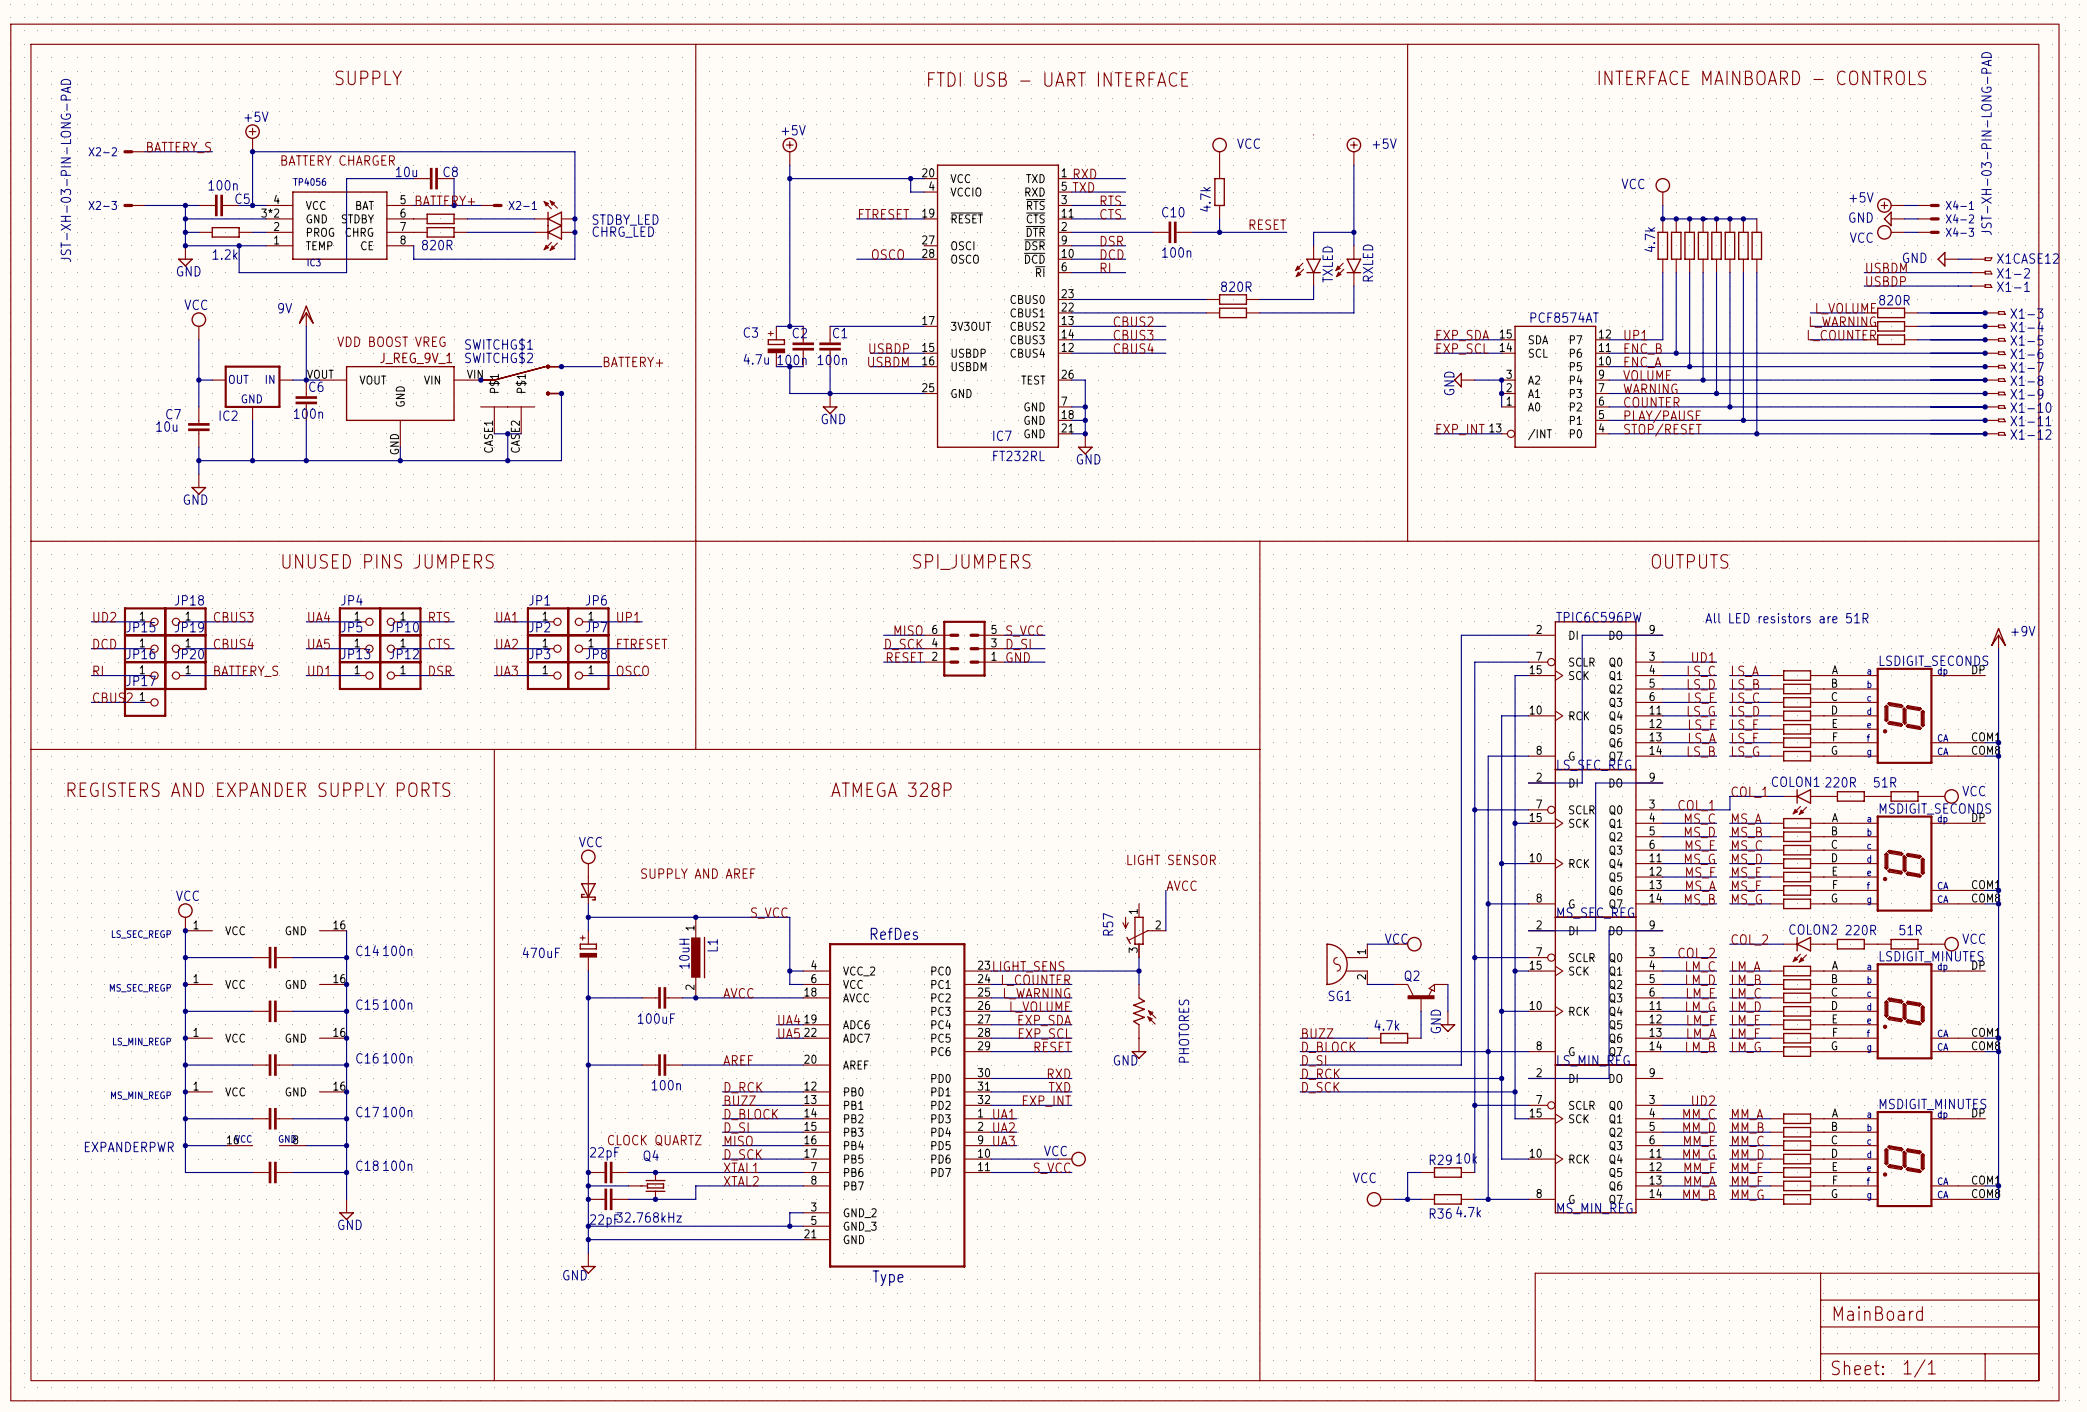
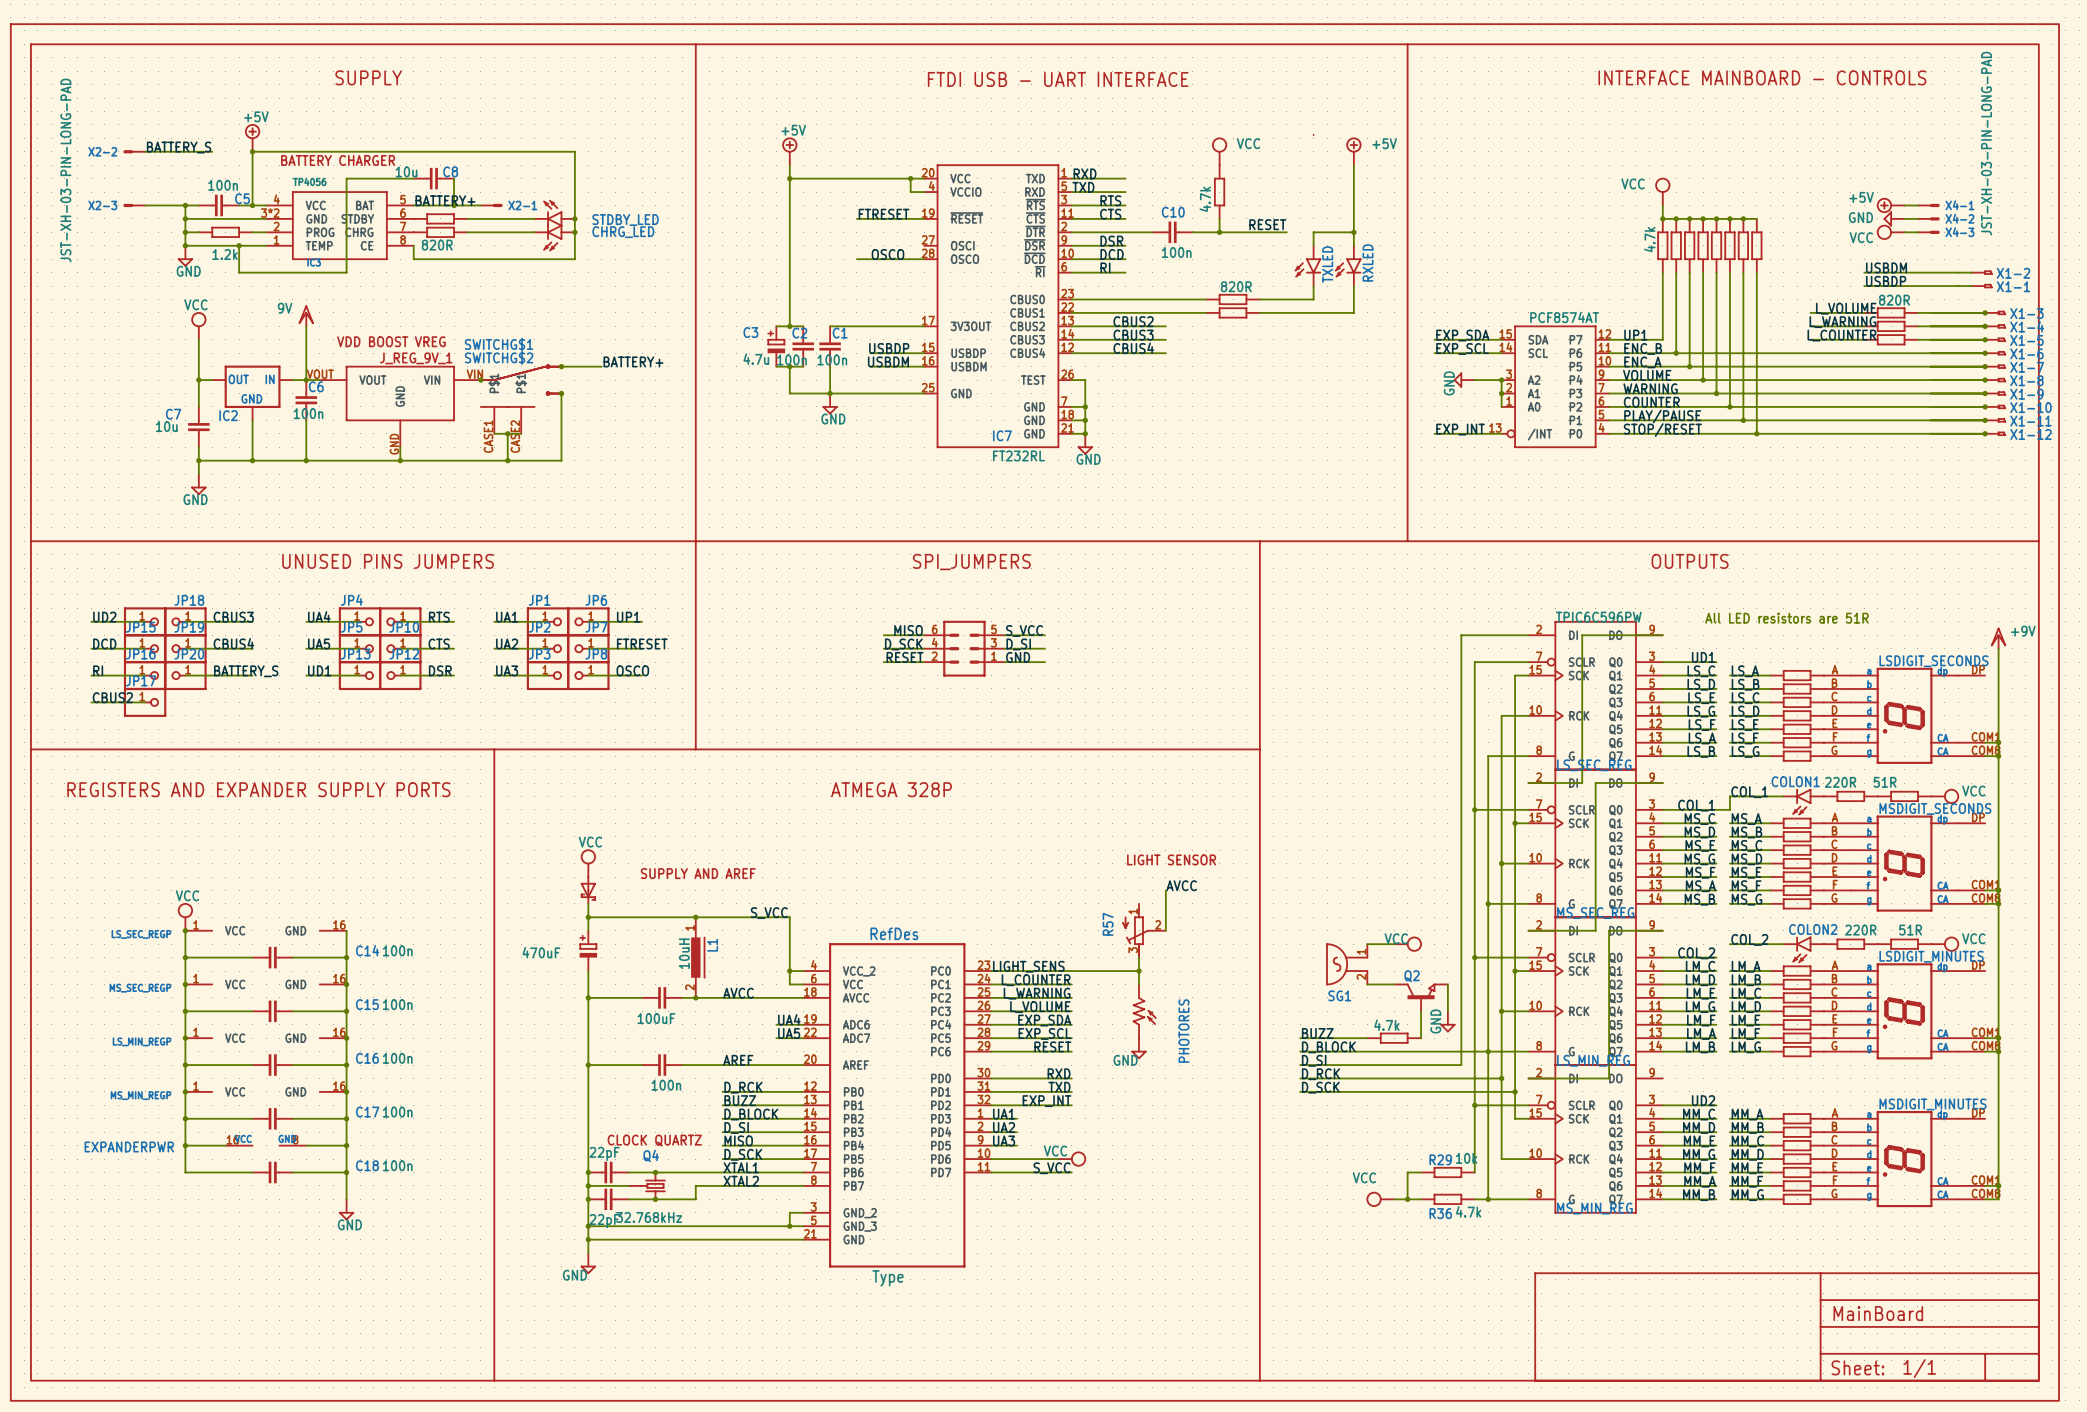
power symbol: GND (1947, 259) -> none
wire: (1958, 259) (1971, 259) -> none
X1CASE12: (1981, 259) -> none

